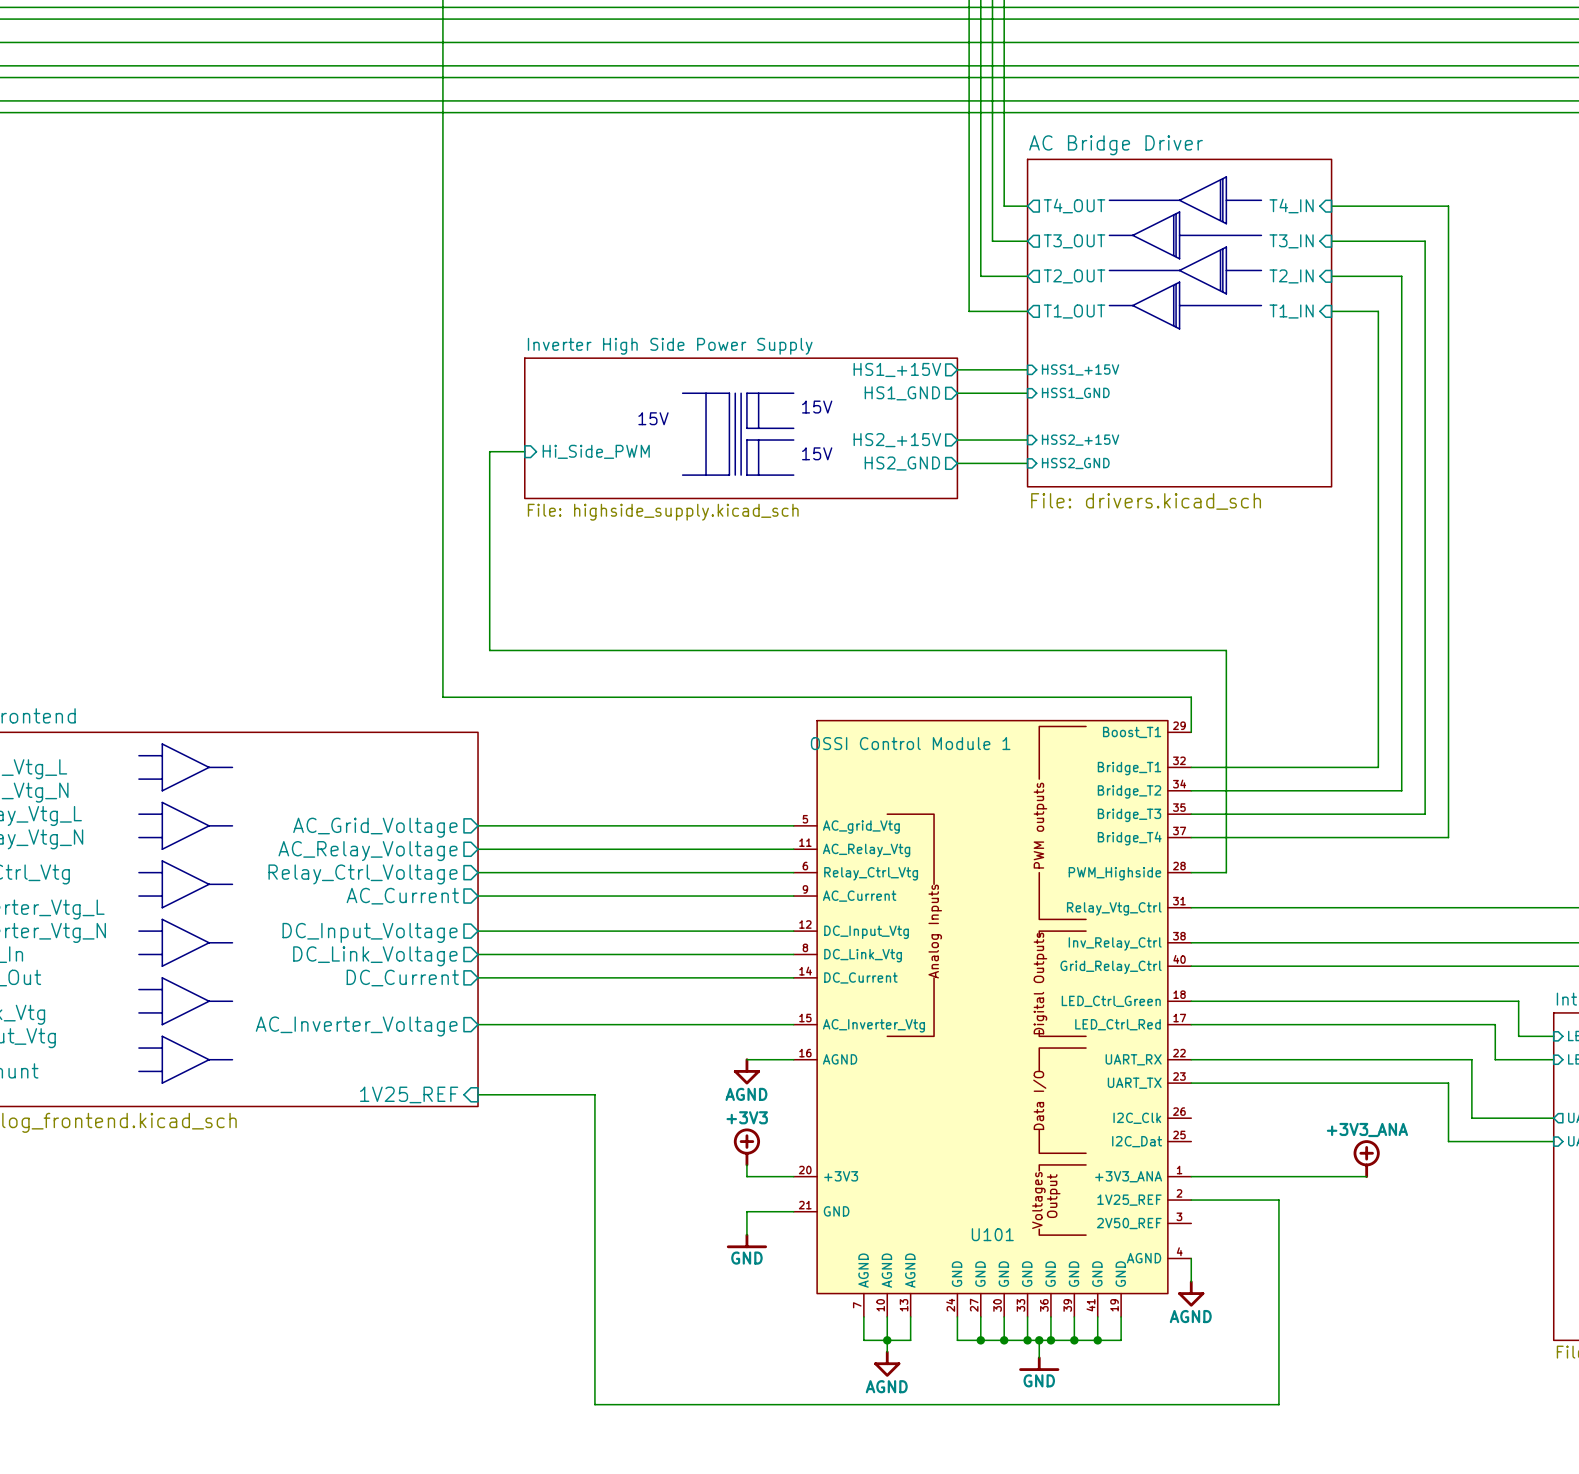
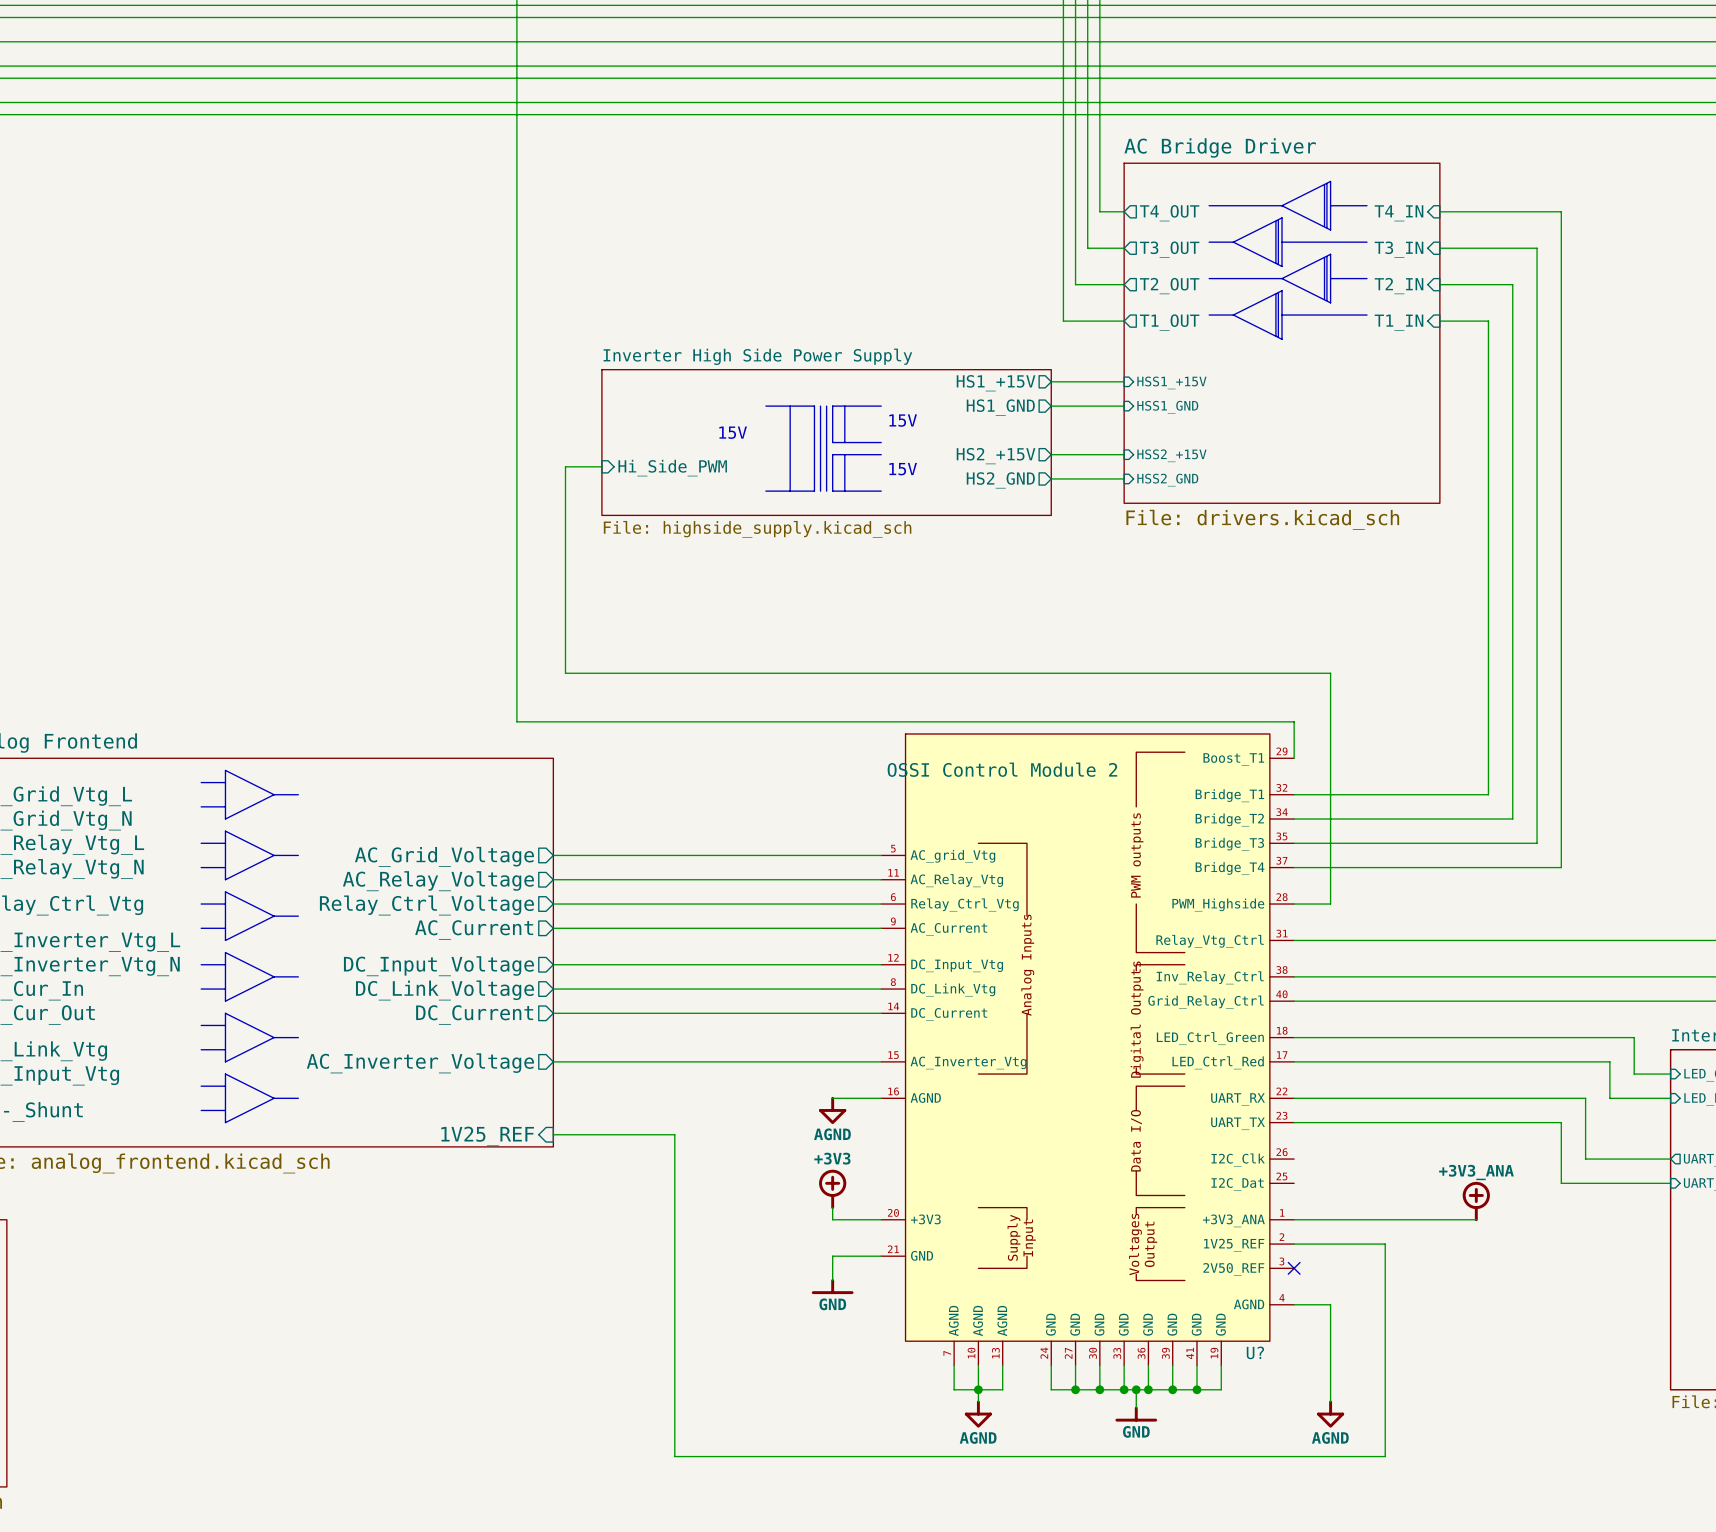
U?: none -> OSSI Control Module 2 (1087, 1049)
U101: OSSI Control Module 1 (992, 1018) -> none
no-connect mark: none -> (1294, 1268)
wire: (1191, 1258) (1191, 1281) -> (1294, 1304) (1330, 1304) (1330, 1401)
power symbol position: AGND (1191, 1293) -> AGND (1330, 1414)

